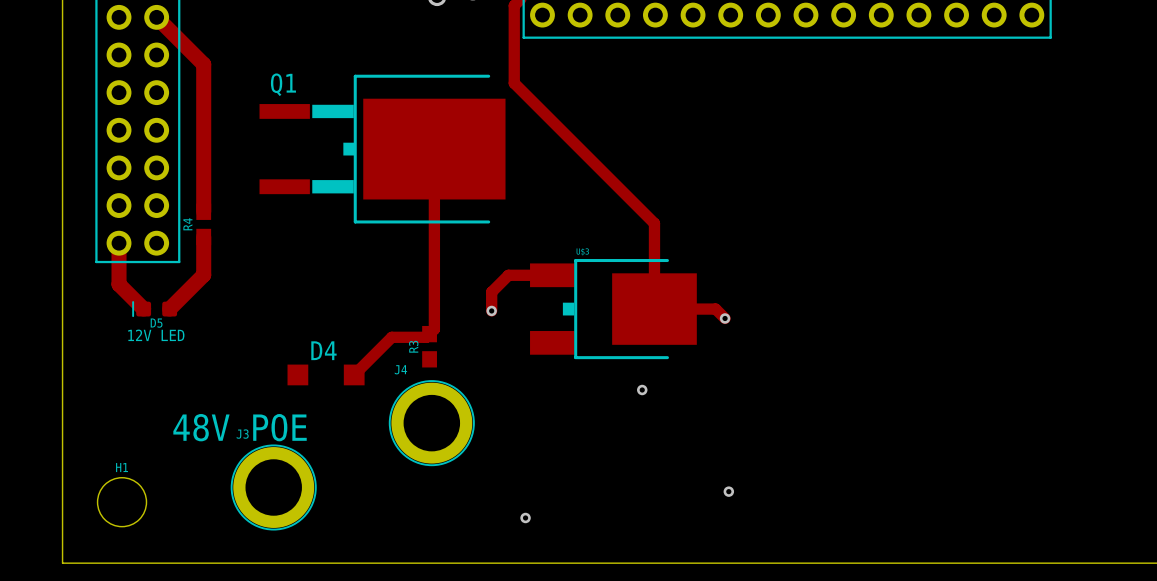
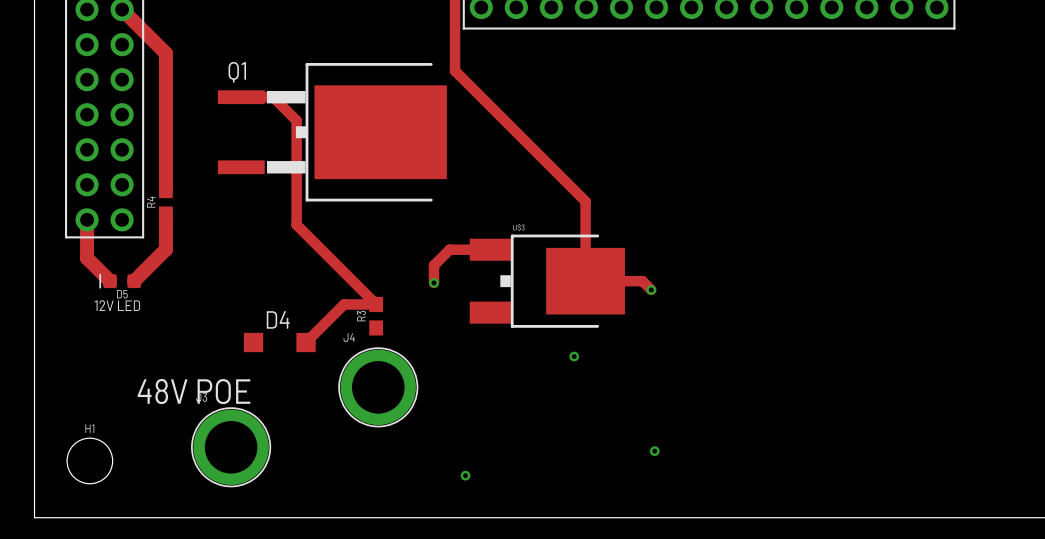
track: (434, 149) (434, 329) (426, 337) (391, 337) -> (241, 97) (273, 97) (296, 120) (296, 224) (376, 304) (344, 304) (341, 307)

